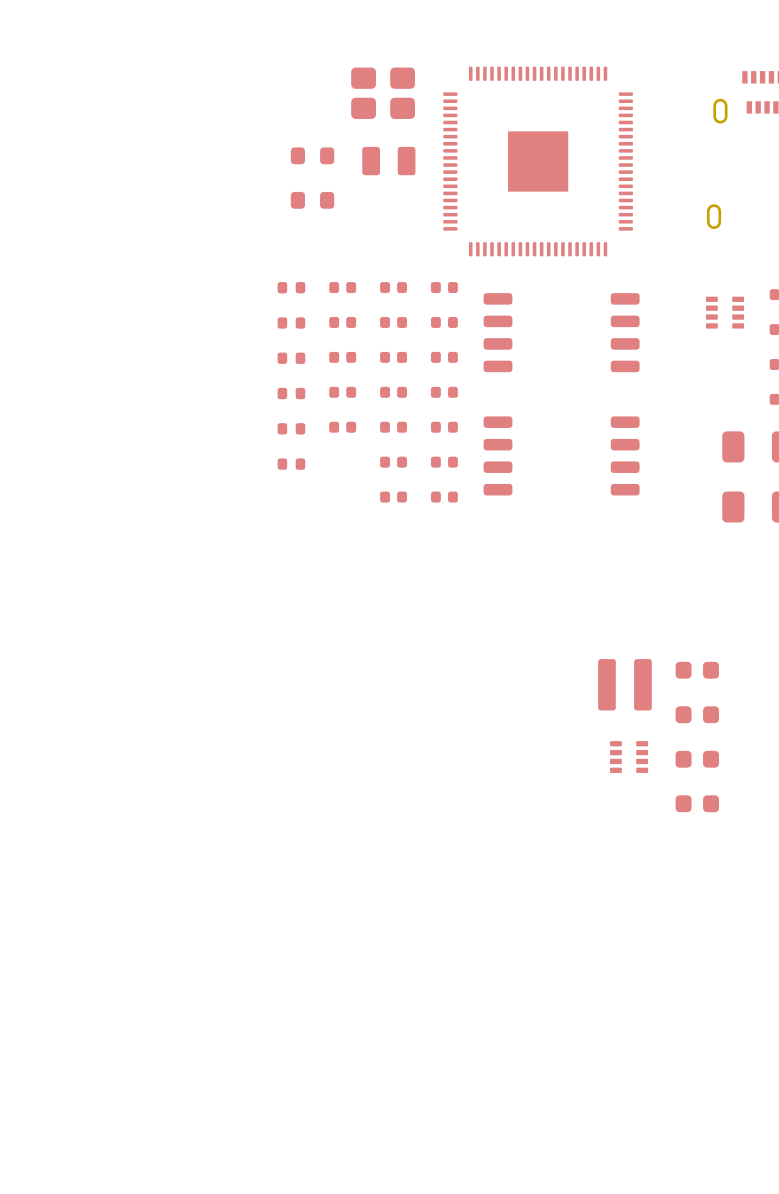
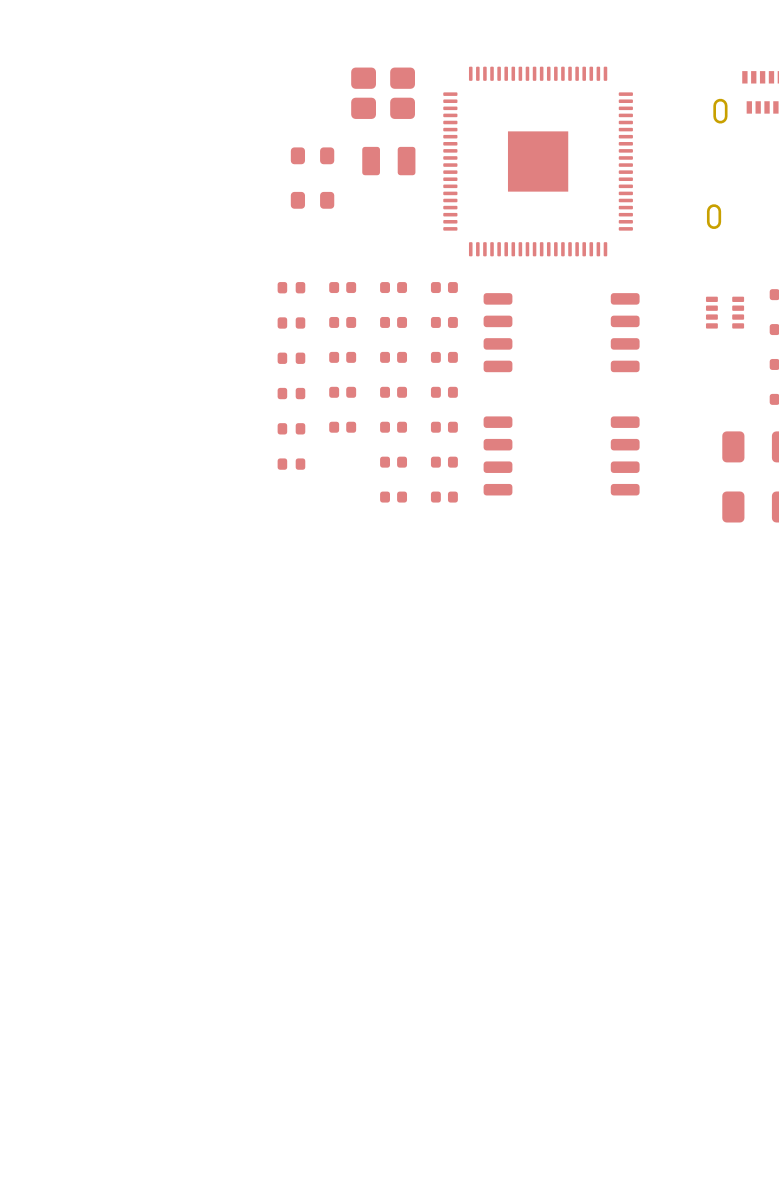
part: (697, 670) -> none
part: (624, 684) -> none
part: (697, 714) -> none
part: (629, 757) -> none
part: (697, 759) -> none
part: (697, 803) -> none

